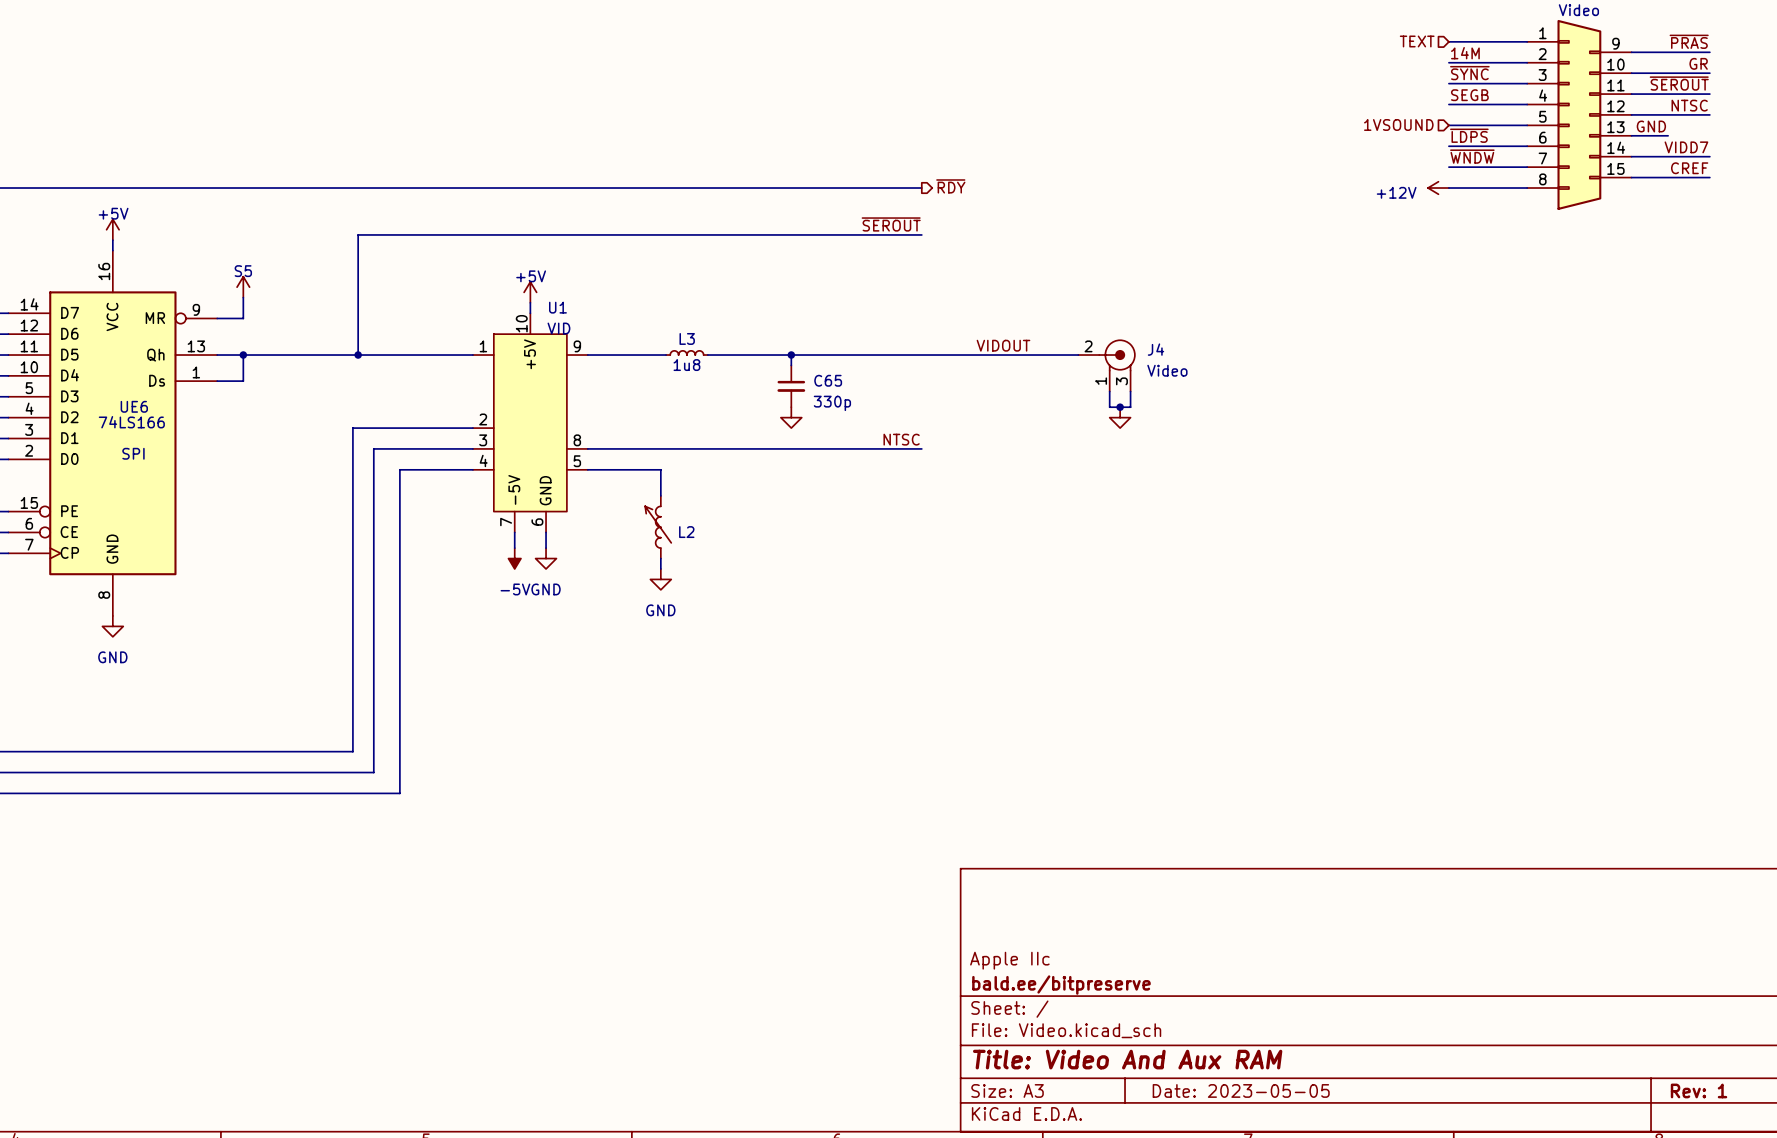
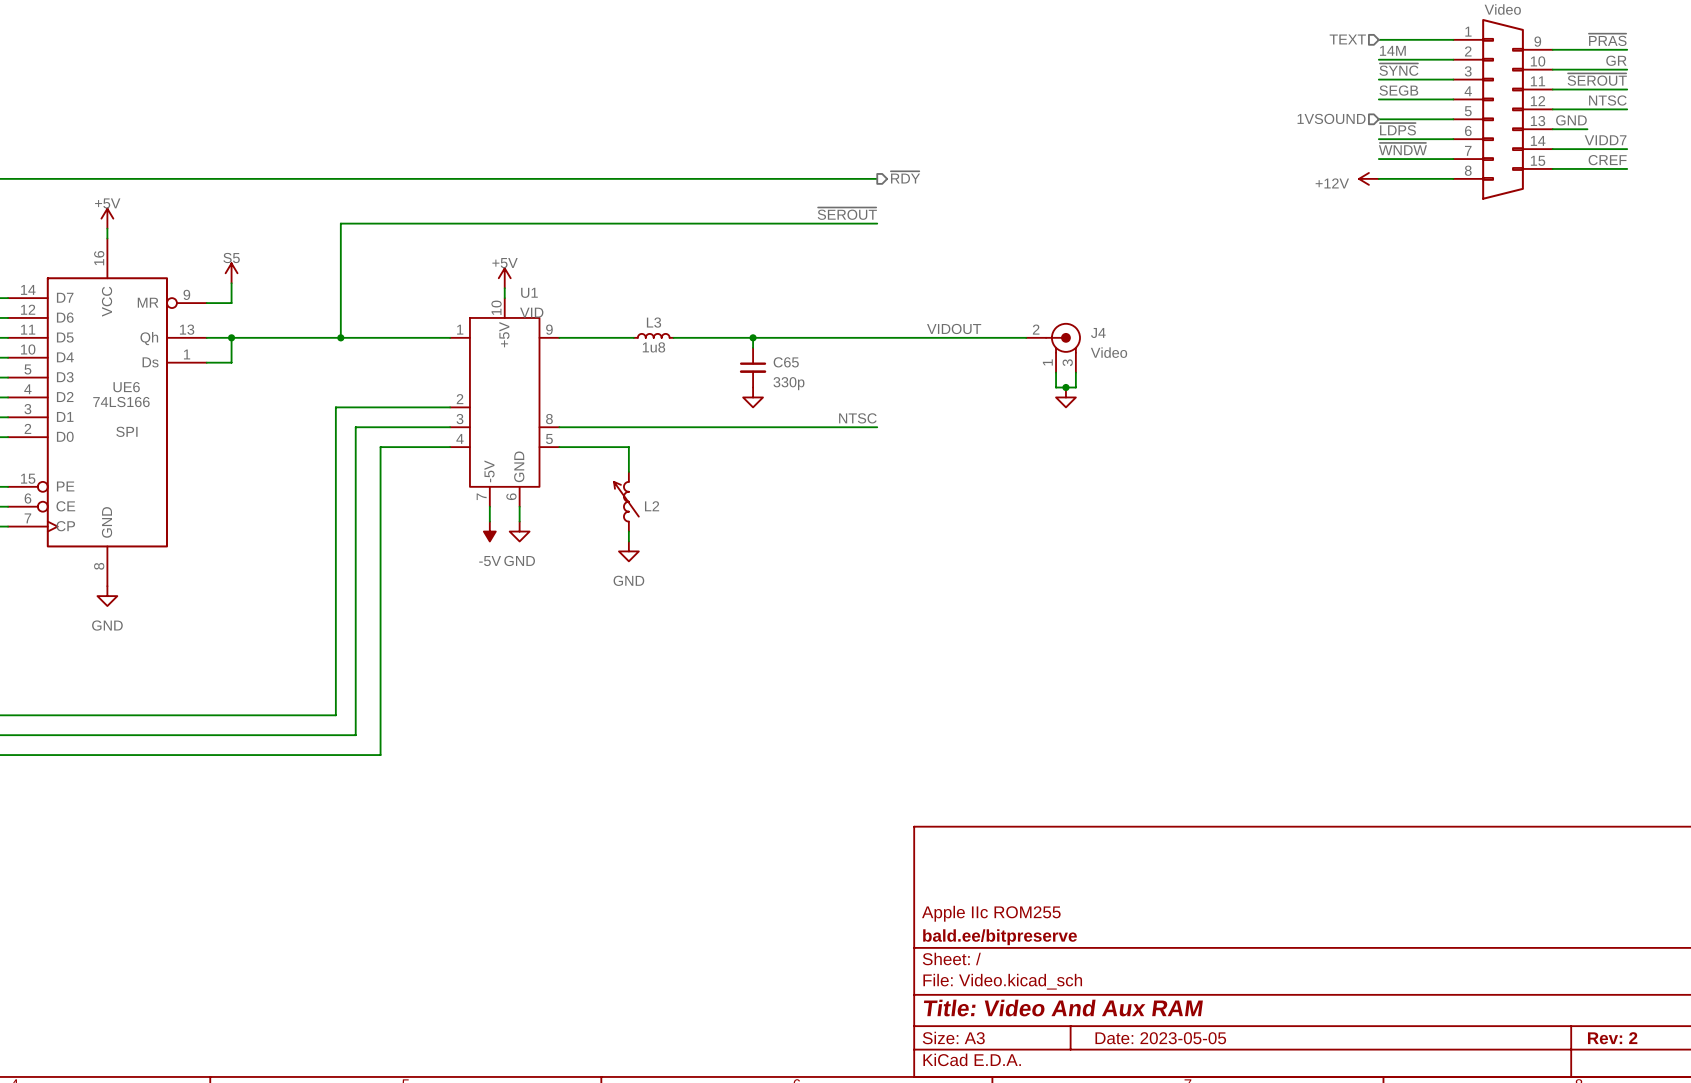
title block: Apple IIc (1009, 960) -> Apple IIc ROM255 (991, 913)
title block: Rev: 1 (1699, 1090) -> Rev: 2 (1612, 1038)

